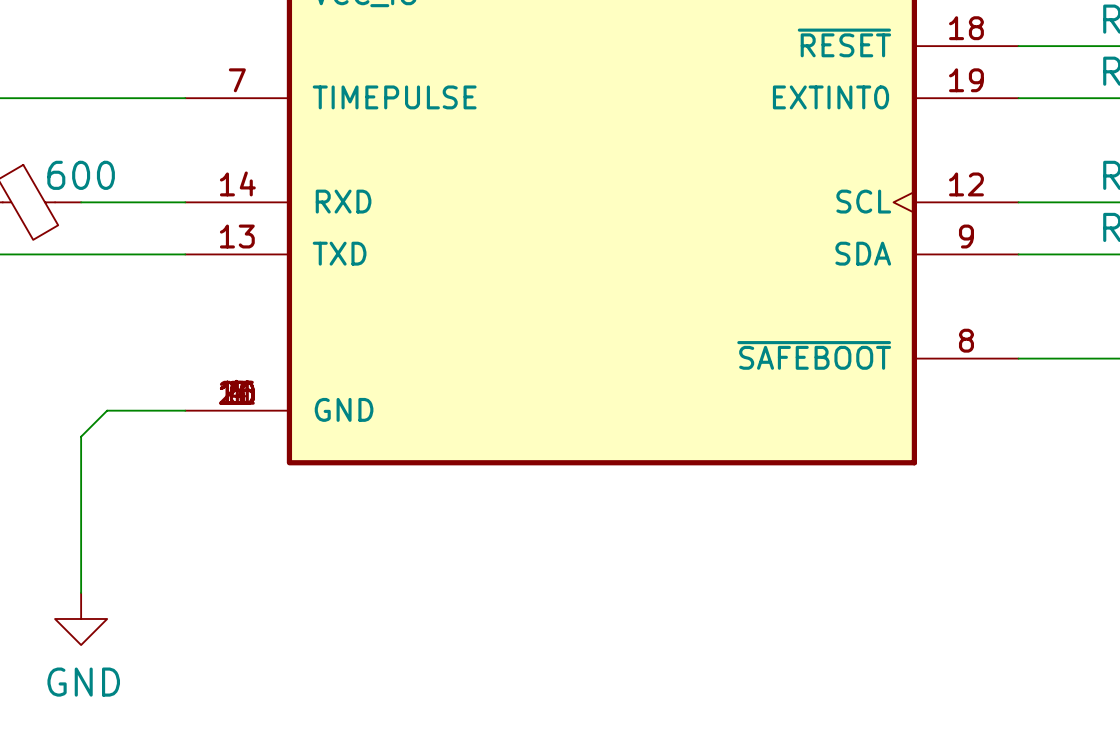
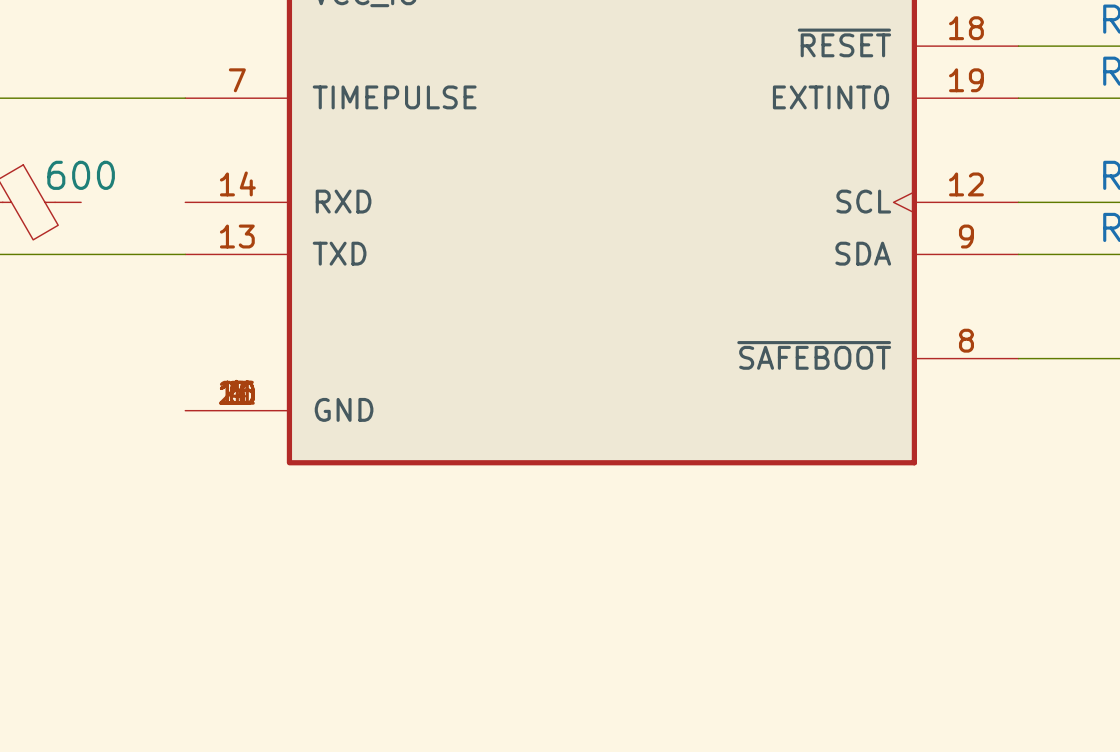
wire: (81, 202) (185, 202) -> none
wire: (185, 410) (107, 410) (81, 436) (81, 592) -> none
power symbol: GND (81, 618) -> none

